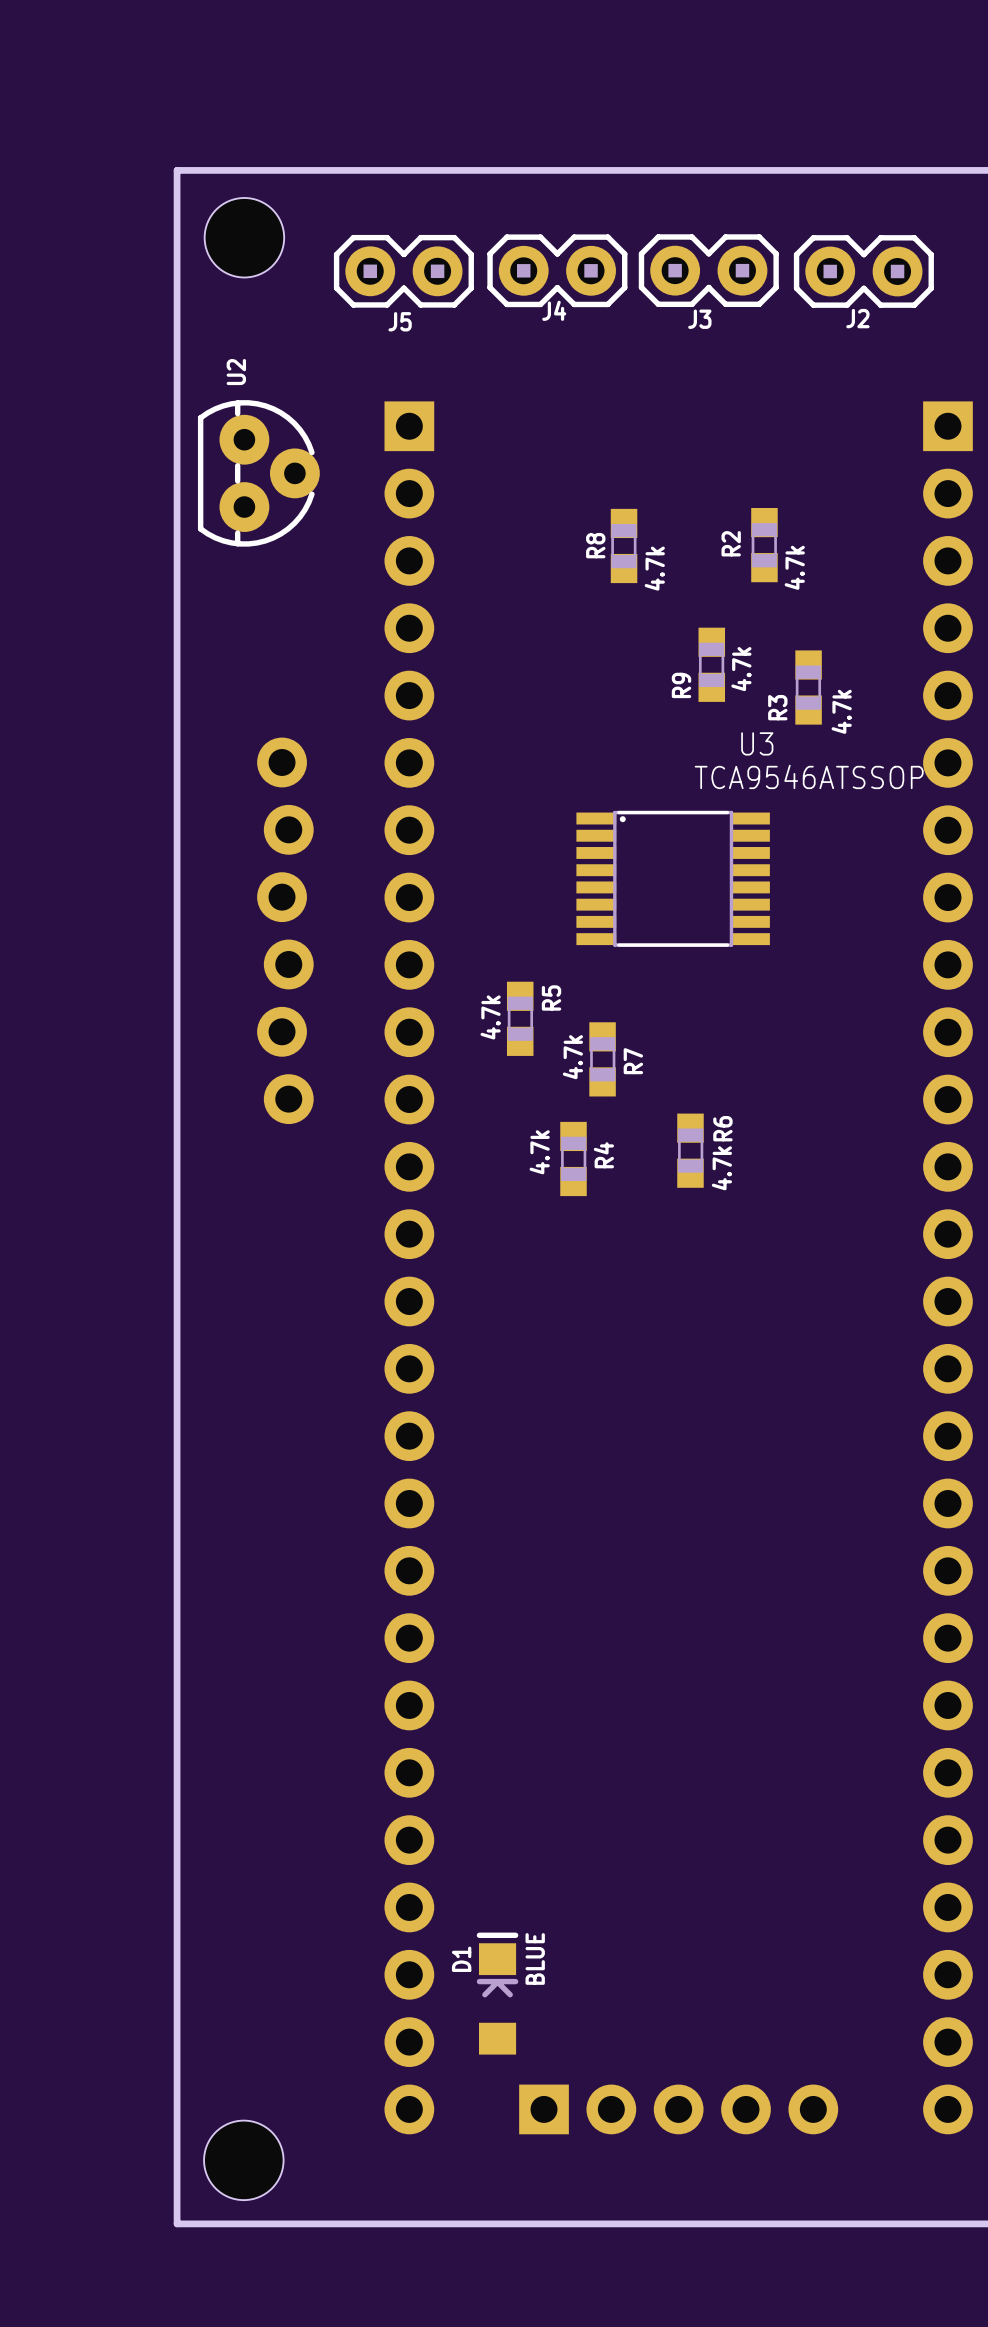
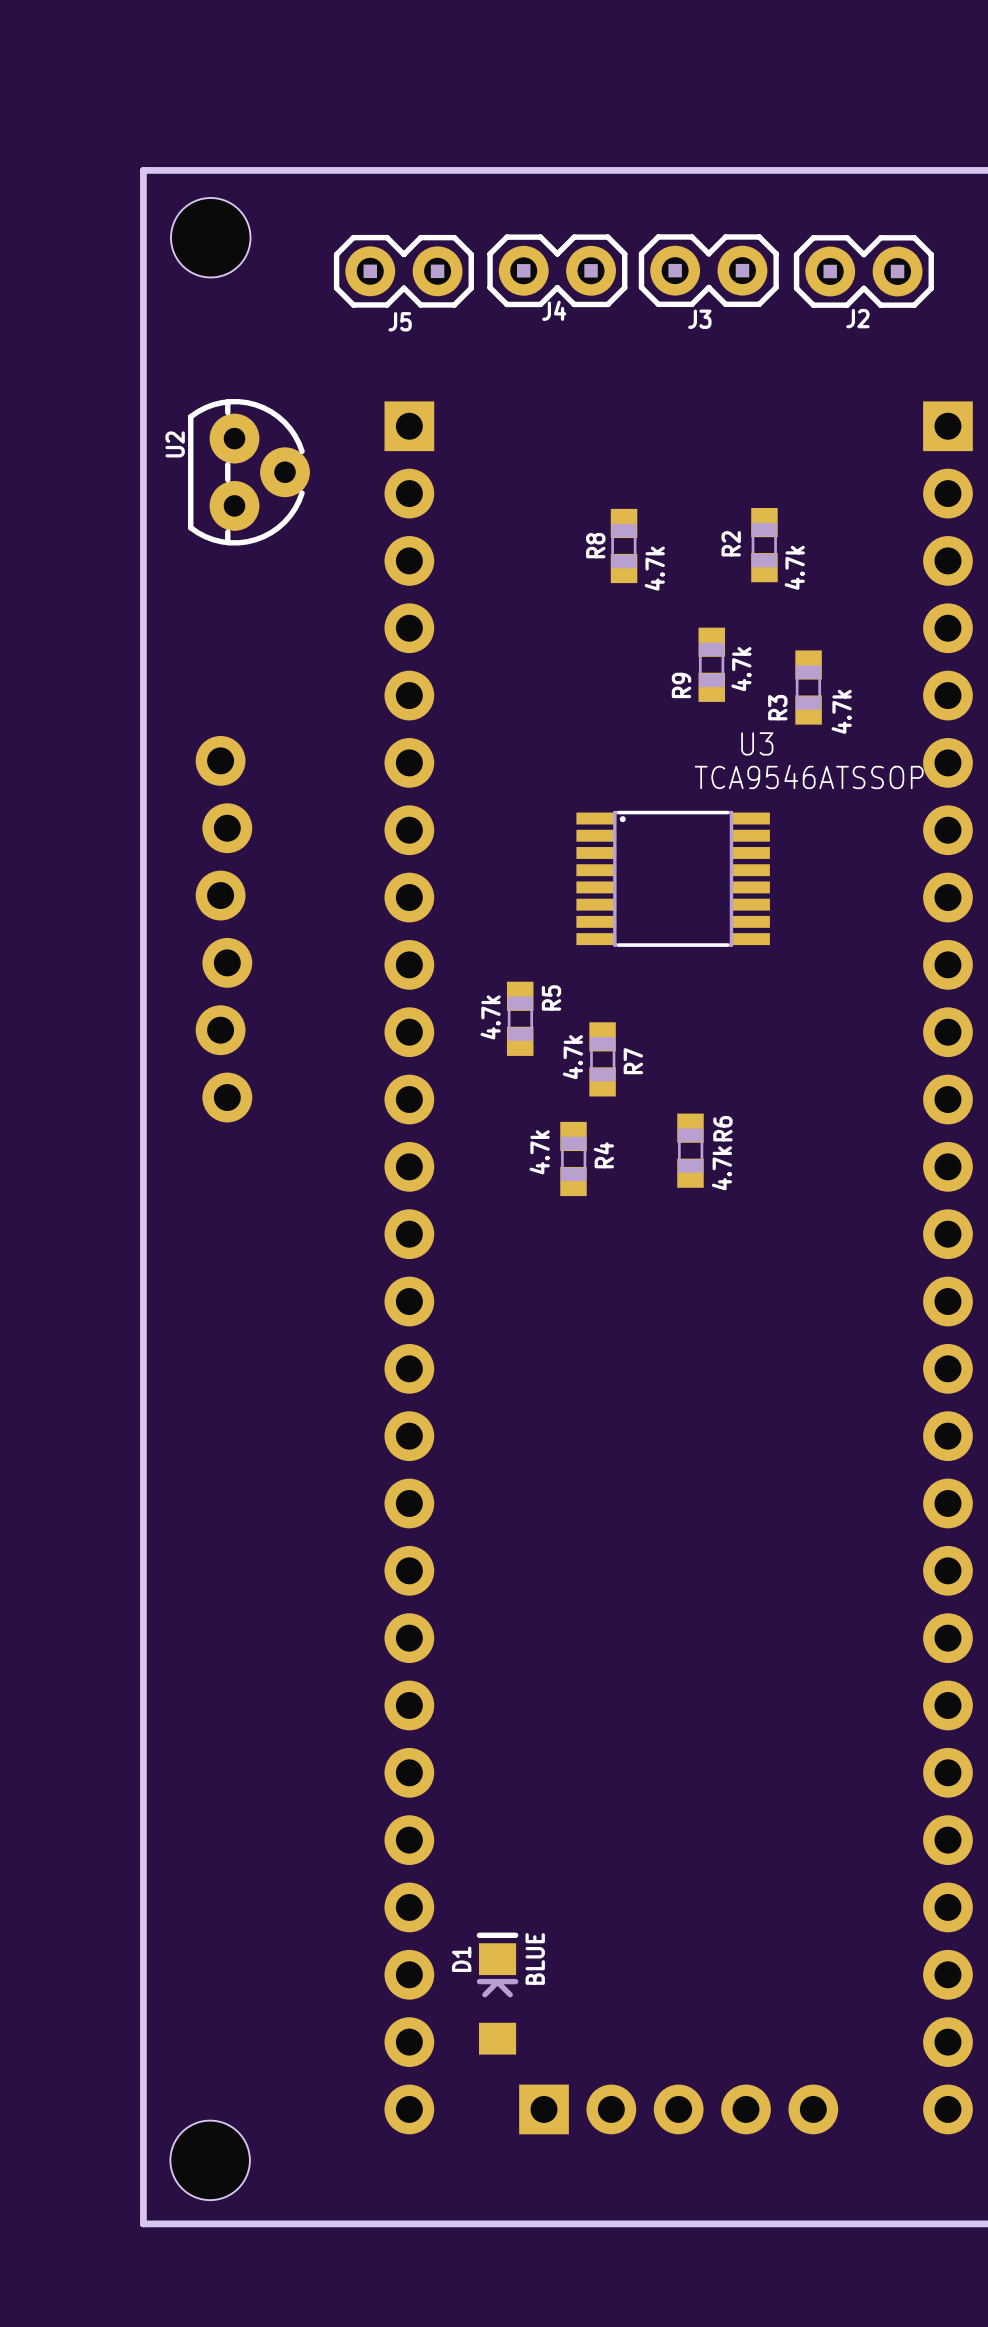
board edge: (177, 170) (177, 2223) -> (177, 170) (143, 170) (143, 2223) (177, 2223)
hole position: (244, 237) -> (210, 237)
U2 name position: U2 (236, 372) -> U2 (175, 444)
U2 footprint: [197, 400, 320, 547] -> [188, 398, 310, 546]
part position: (285, 930) -> (223, 929)
hole position: (243, 2160) -> (210, 2160)

